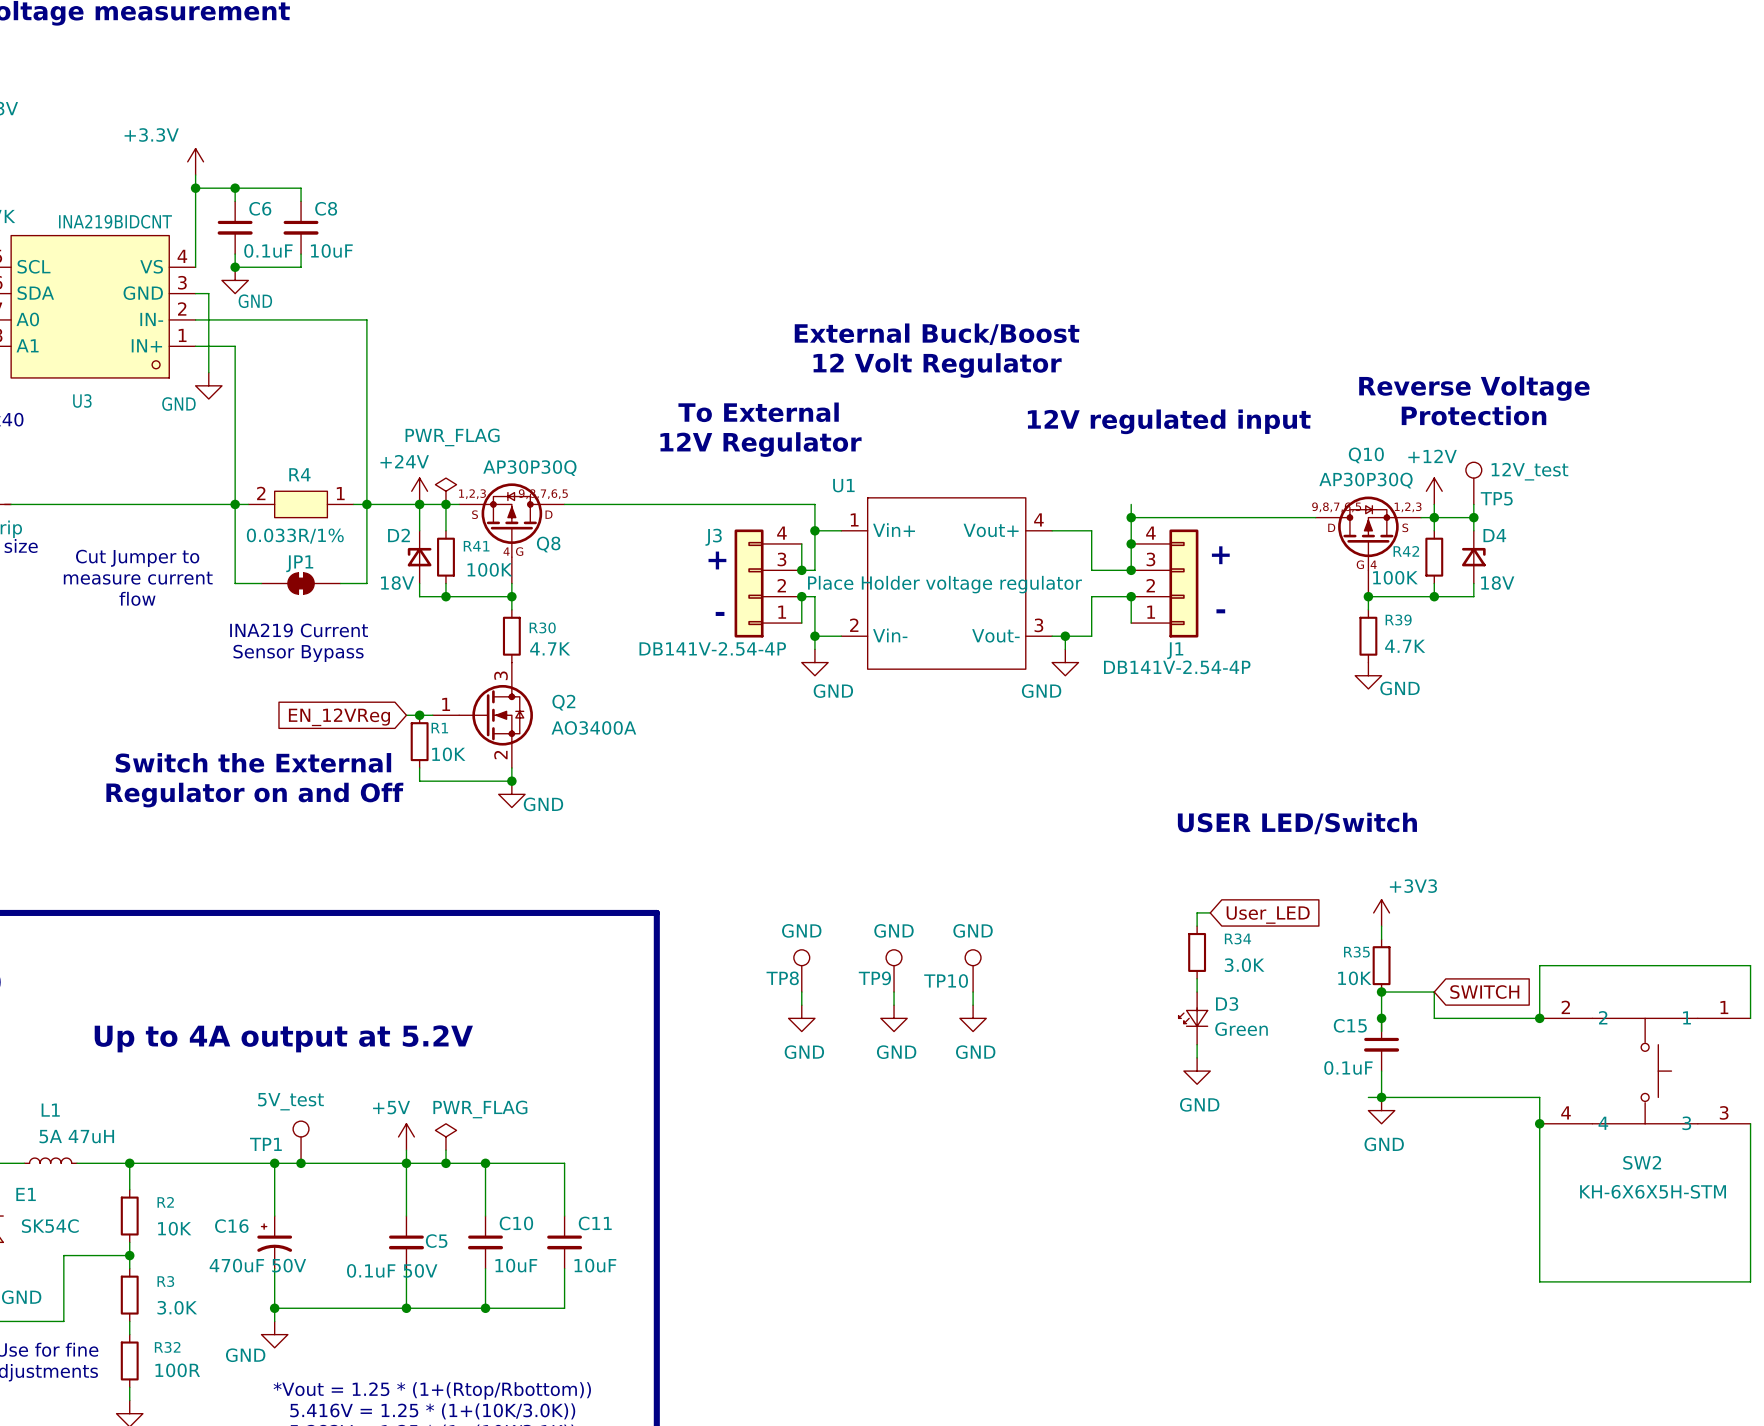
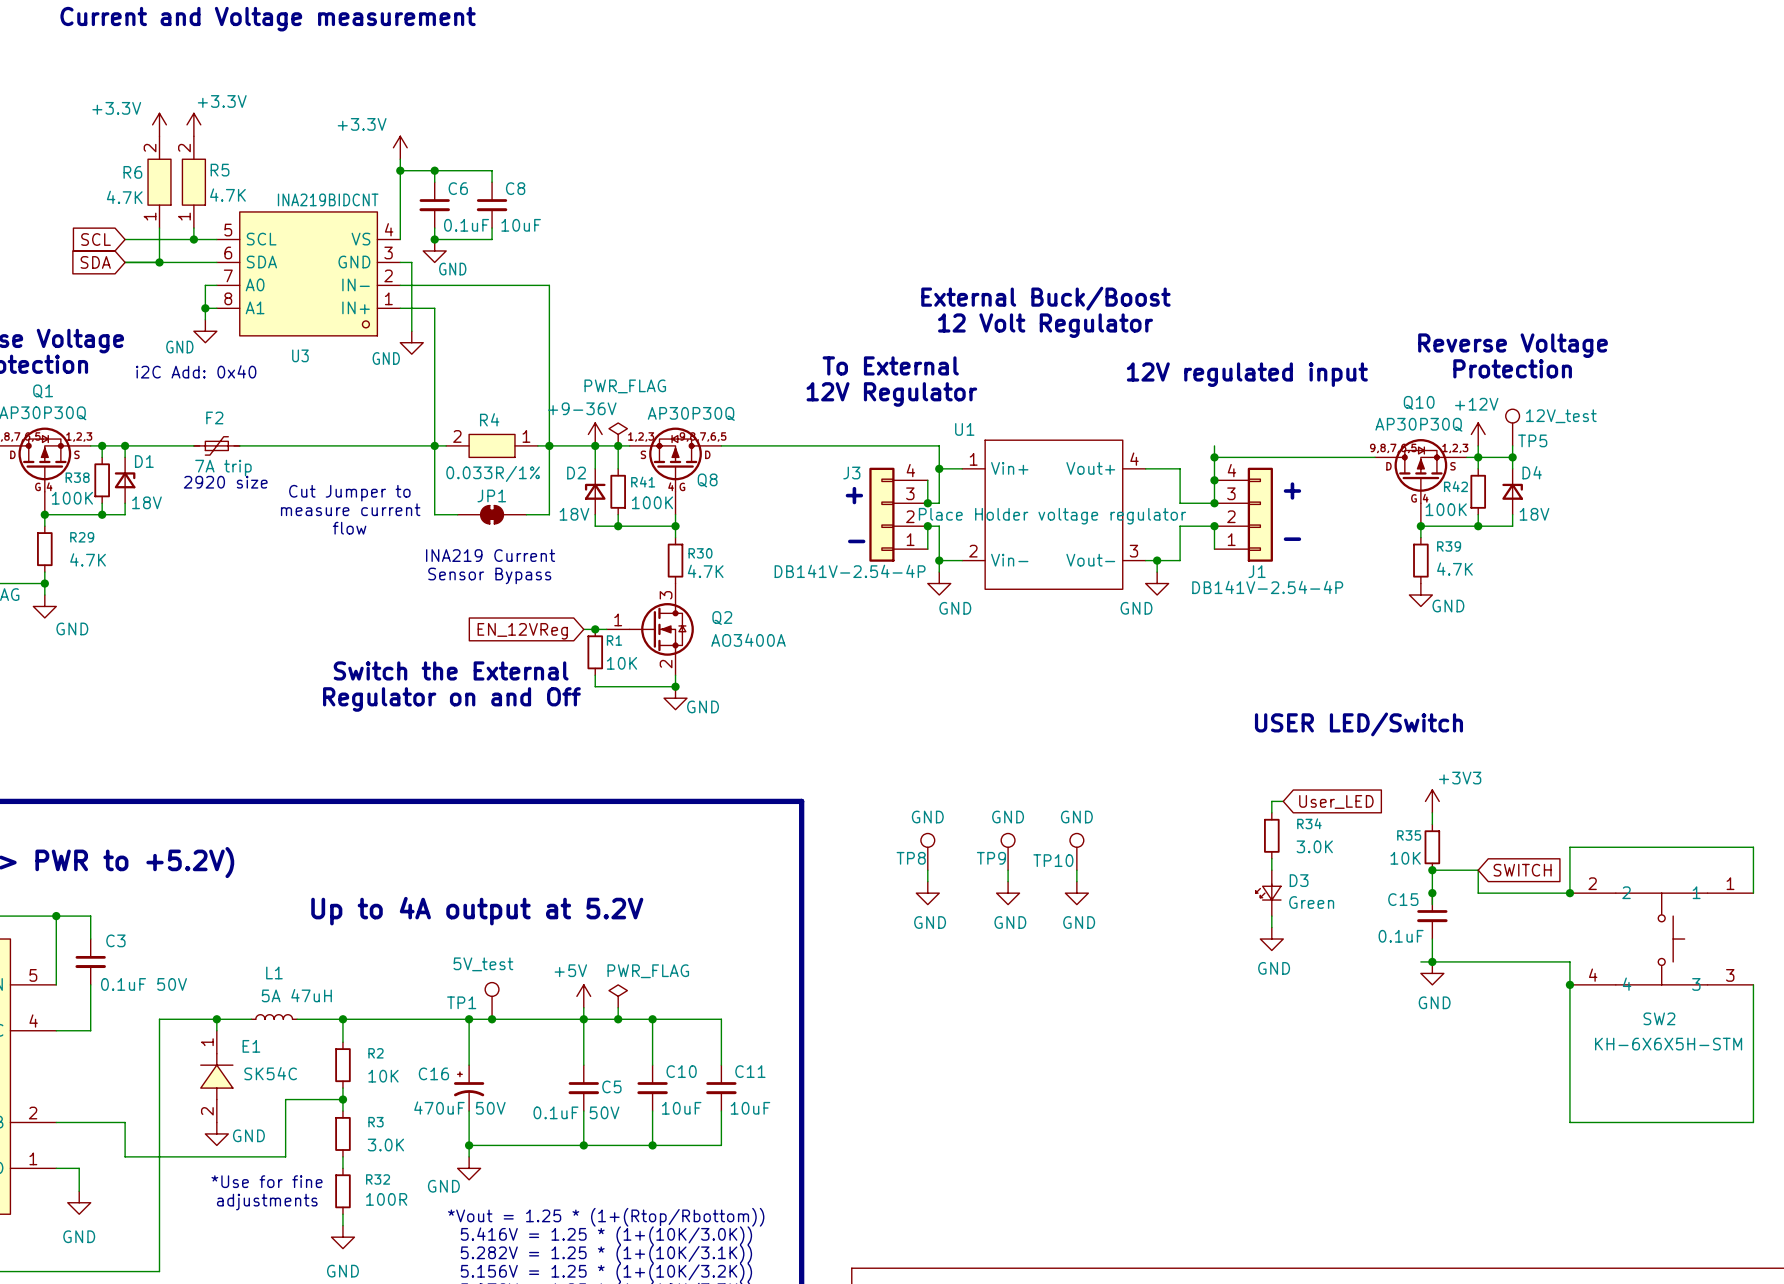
power symbol: +24V (419, 491) -> +9-36V (595, 434)

